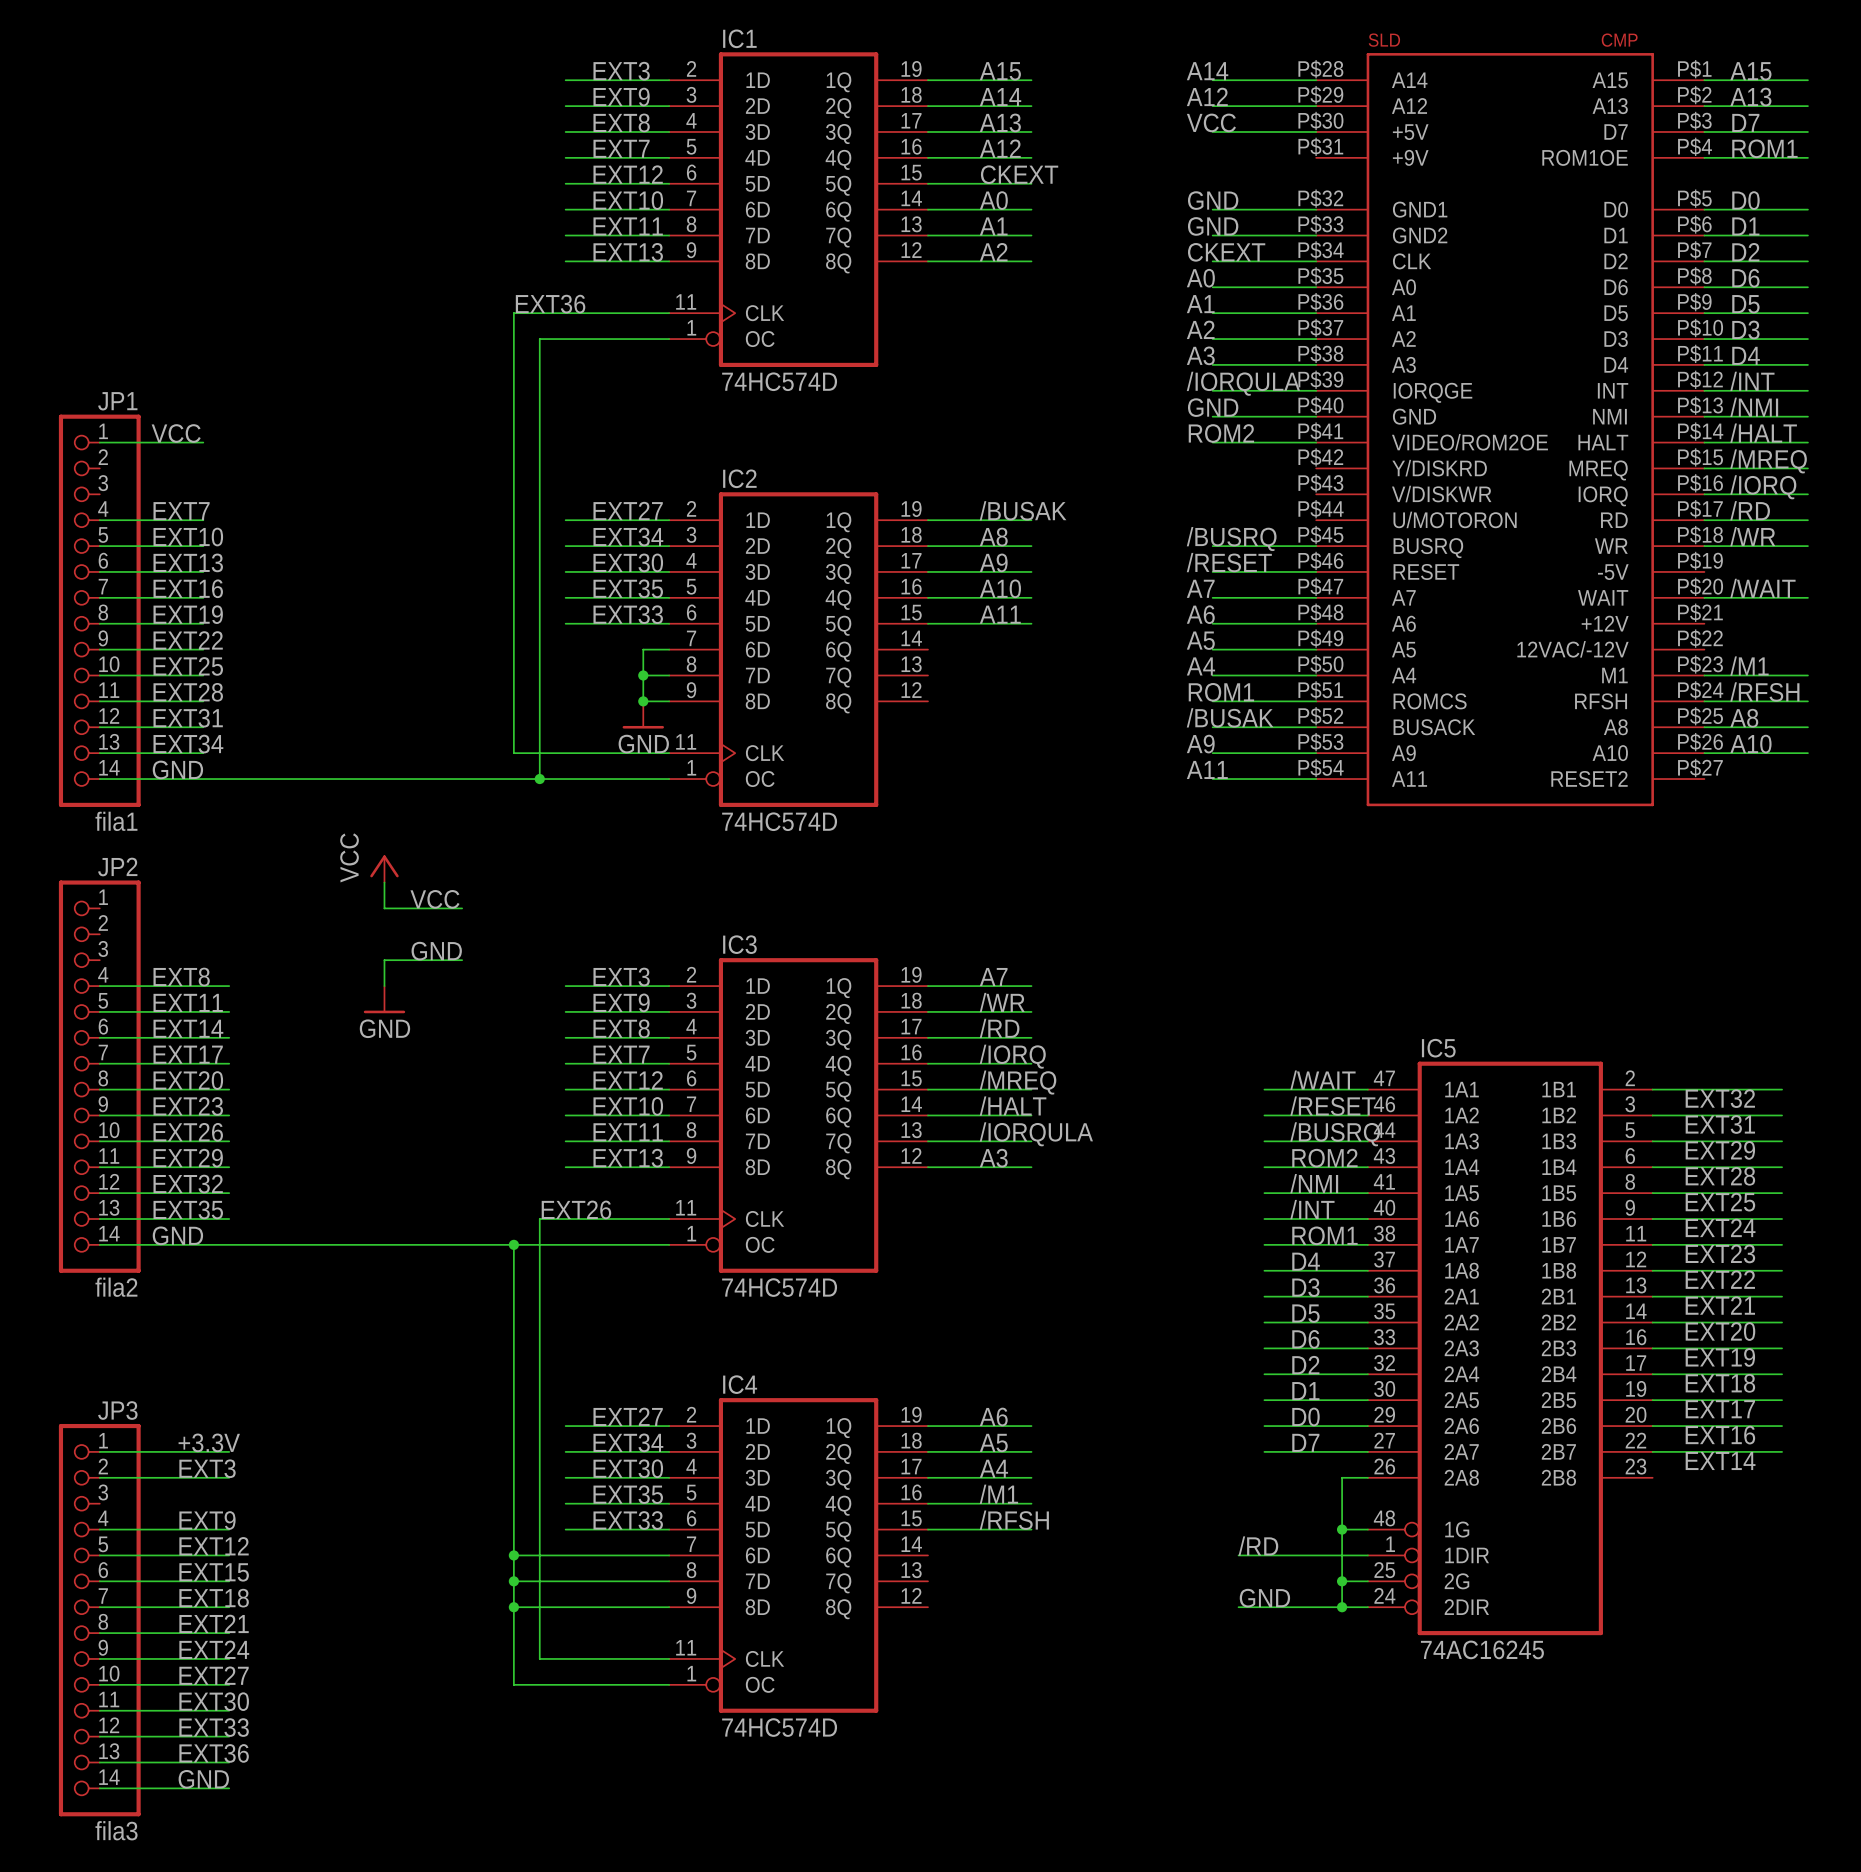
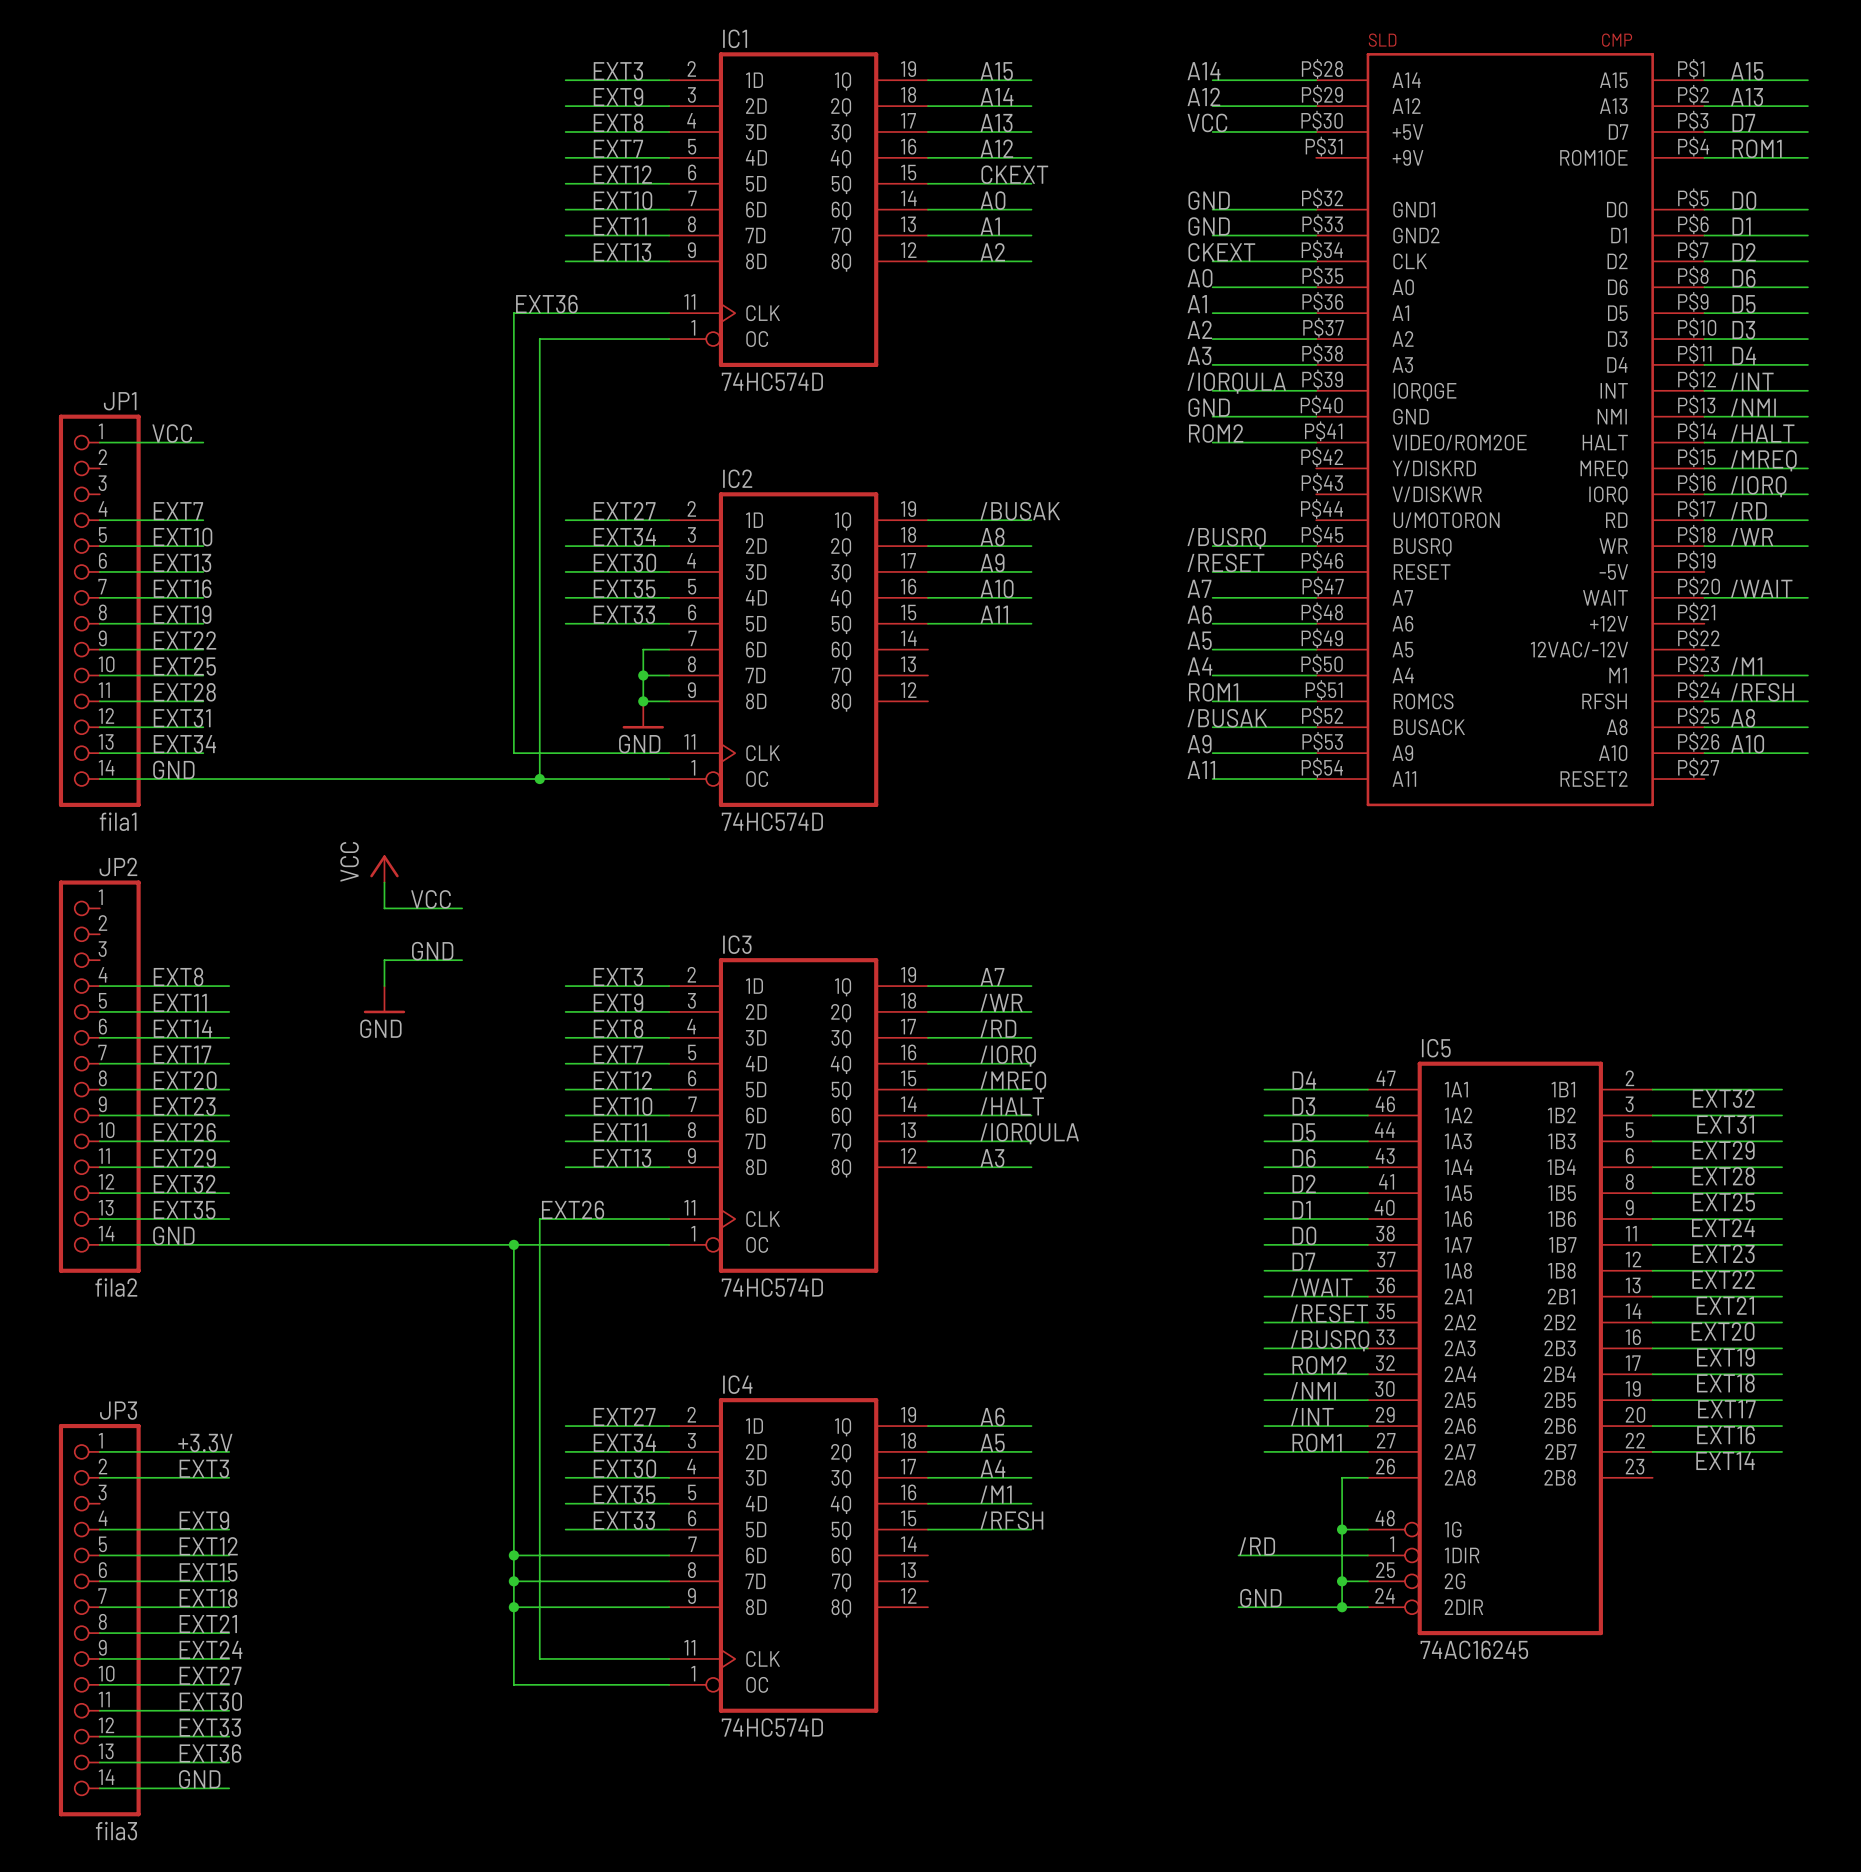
label: /WAIT (1322, 1080) -> D4 (1304, 1080)
label: /RESET (1332, 1106) -> D3 (1303, 1106)
label: /BUSRQ (1335, 1134) -> D5 (1304, 1132)
label: ROM2 (1324, 1158) -> D6 (1304, 1158)
label: /NMI (1314, 1183) -> D2 (1304, 1183)
label: /INT (1312, 1209) -> D1 (1301, 1209)
label: ROM1 (1324, 1235) -> D0 (1304, 1235)
label: D4 (1306, 1261) -> D7 (1303, 1261)
label: D3 (1305, 1287) -> /WAIT (1321, 1287)
label: D5 (1305, 1313) -> /RESET (1329, 1313)
label: D6 (1305, 1339) -> /BUSRQ (1330, 1340)
label: D2 (1305, 1365) -> ROM2 (1319, 1365)
label: D1 (1305, 1391) -> /NMI (1313, 1391)
label: D0 (1305, 1416) -> /INT (1312, 1416)
label: D7 (1305, 1442) -> ROM1 (1317, 1442)

